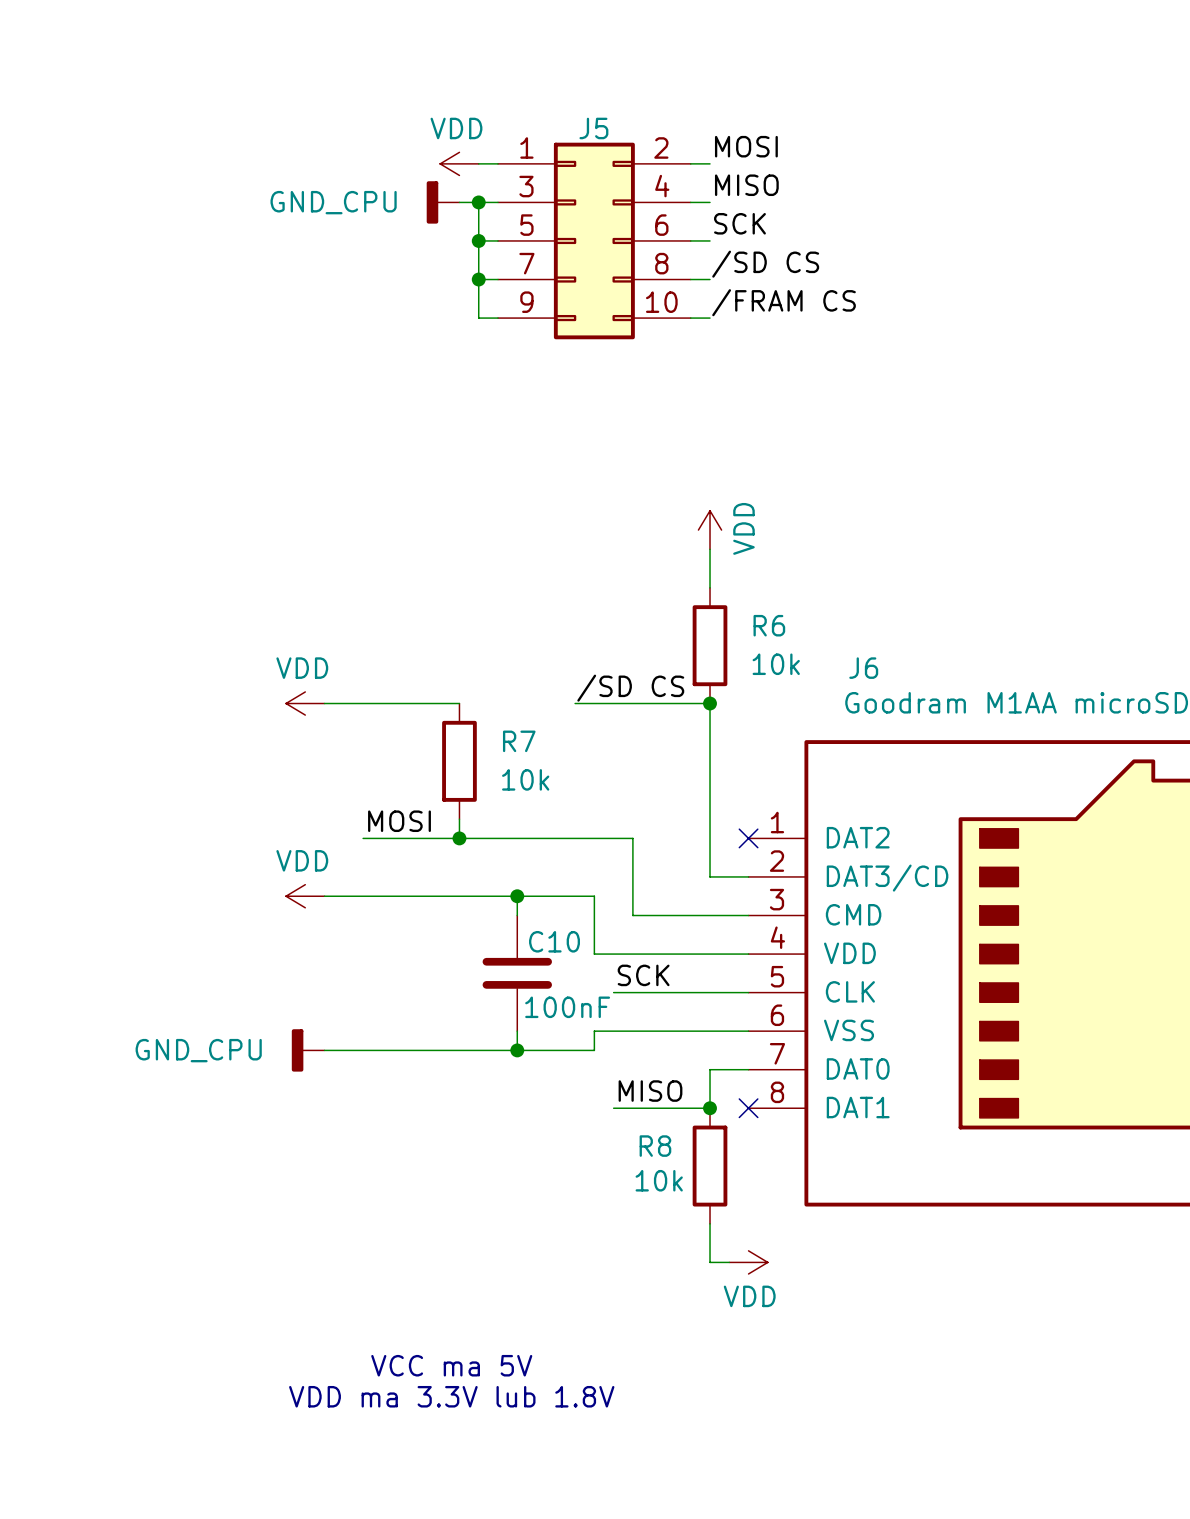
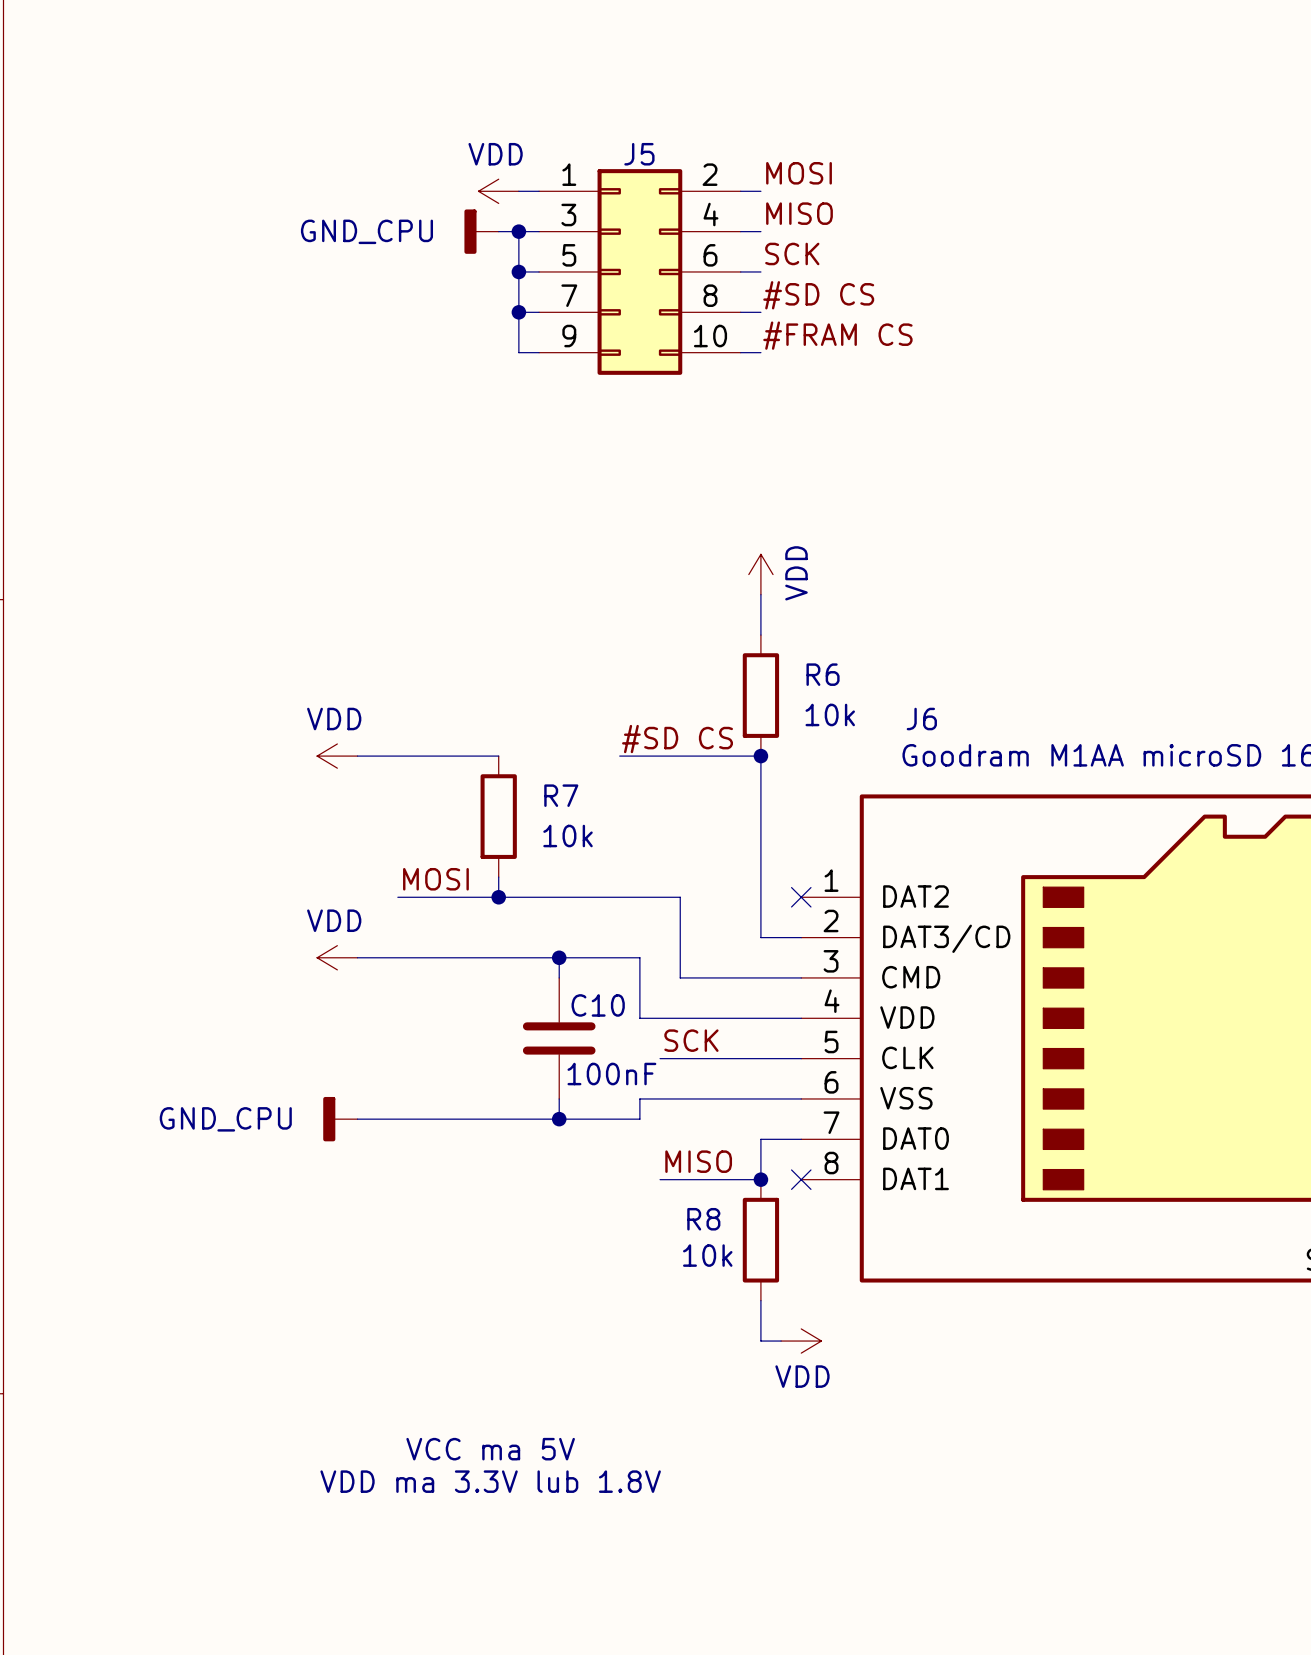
label: /SD CS (765, 264) -> #SD CS (818, 295)
label: /FRAM CS (784, 302) -> #FRAM CS (837, 335)
label: /SD CS (630, 688) -> #SD CS (677, 739)

